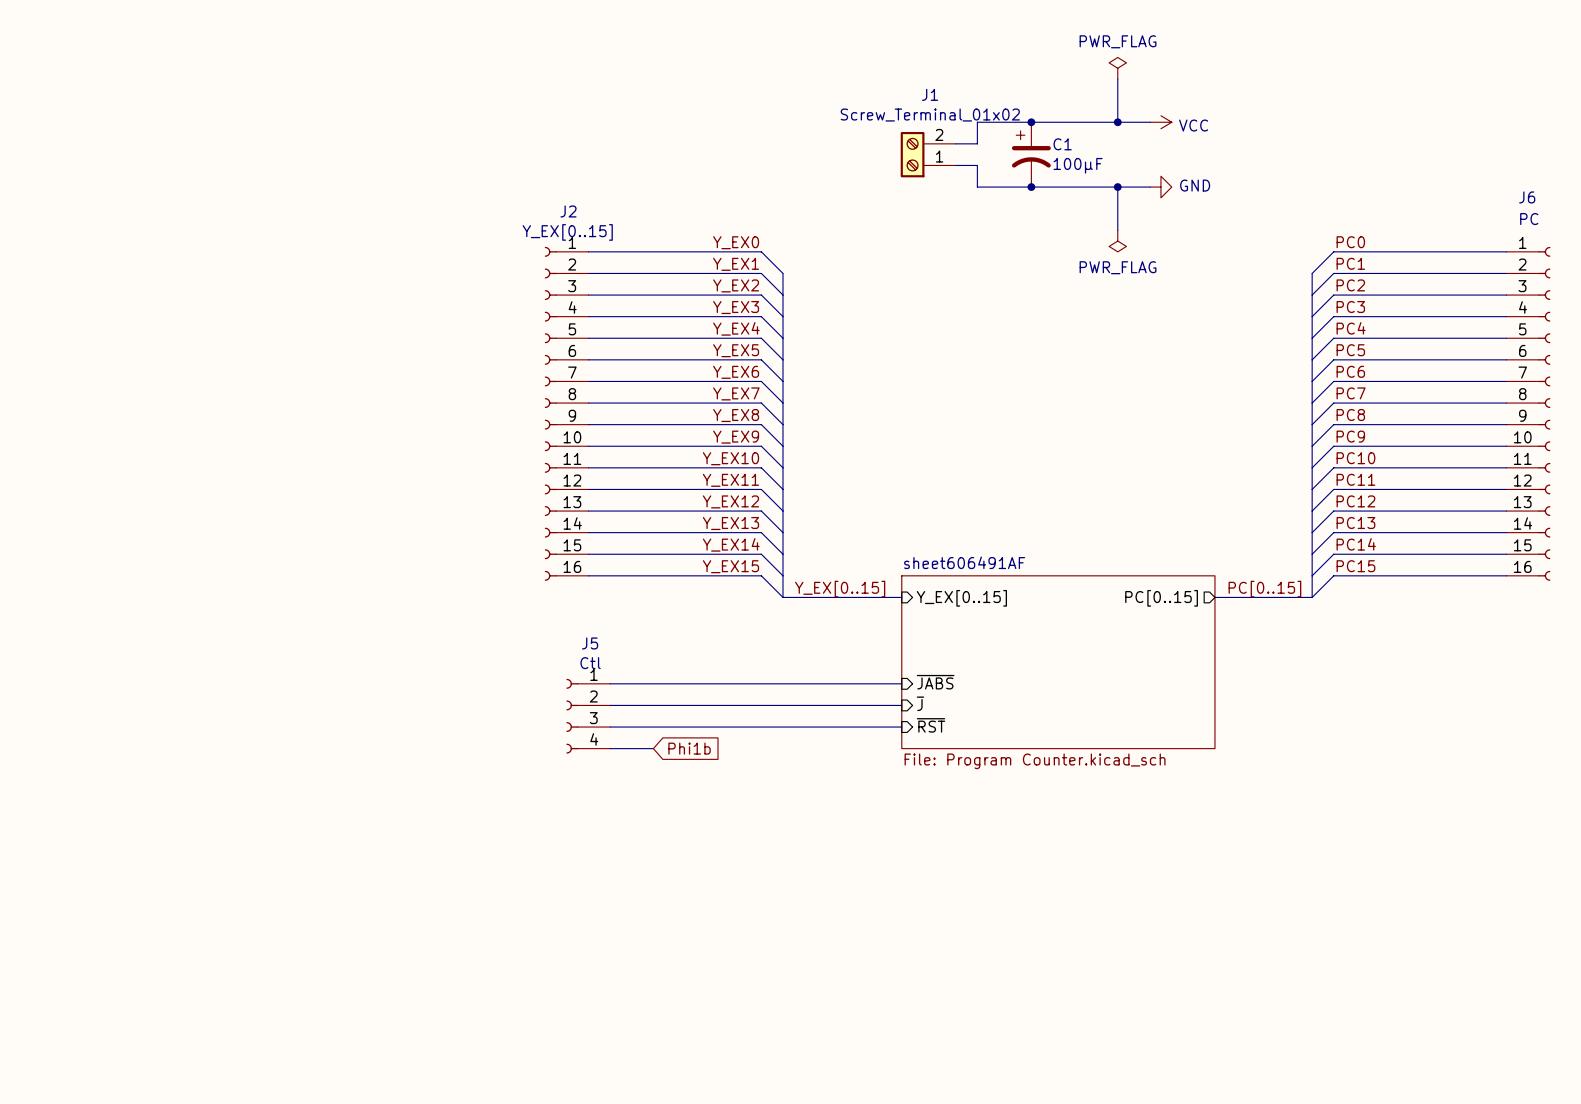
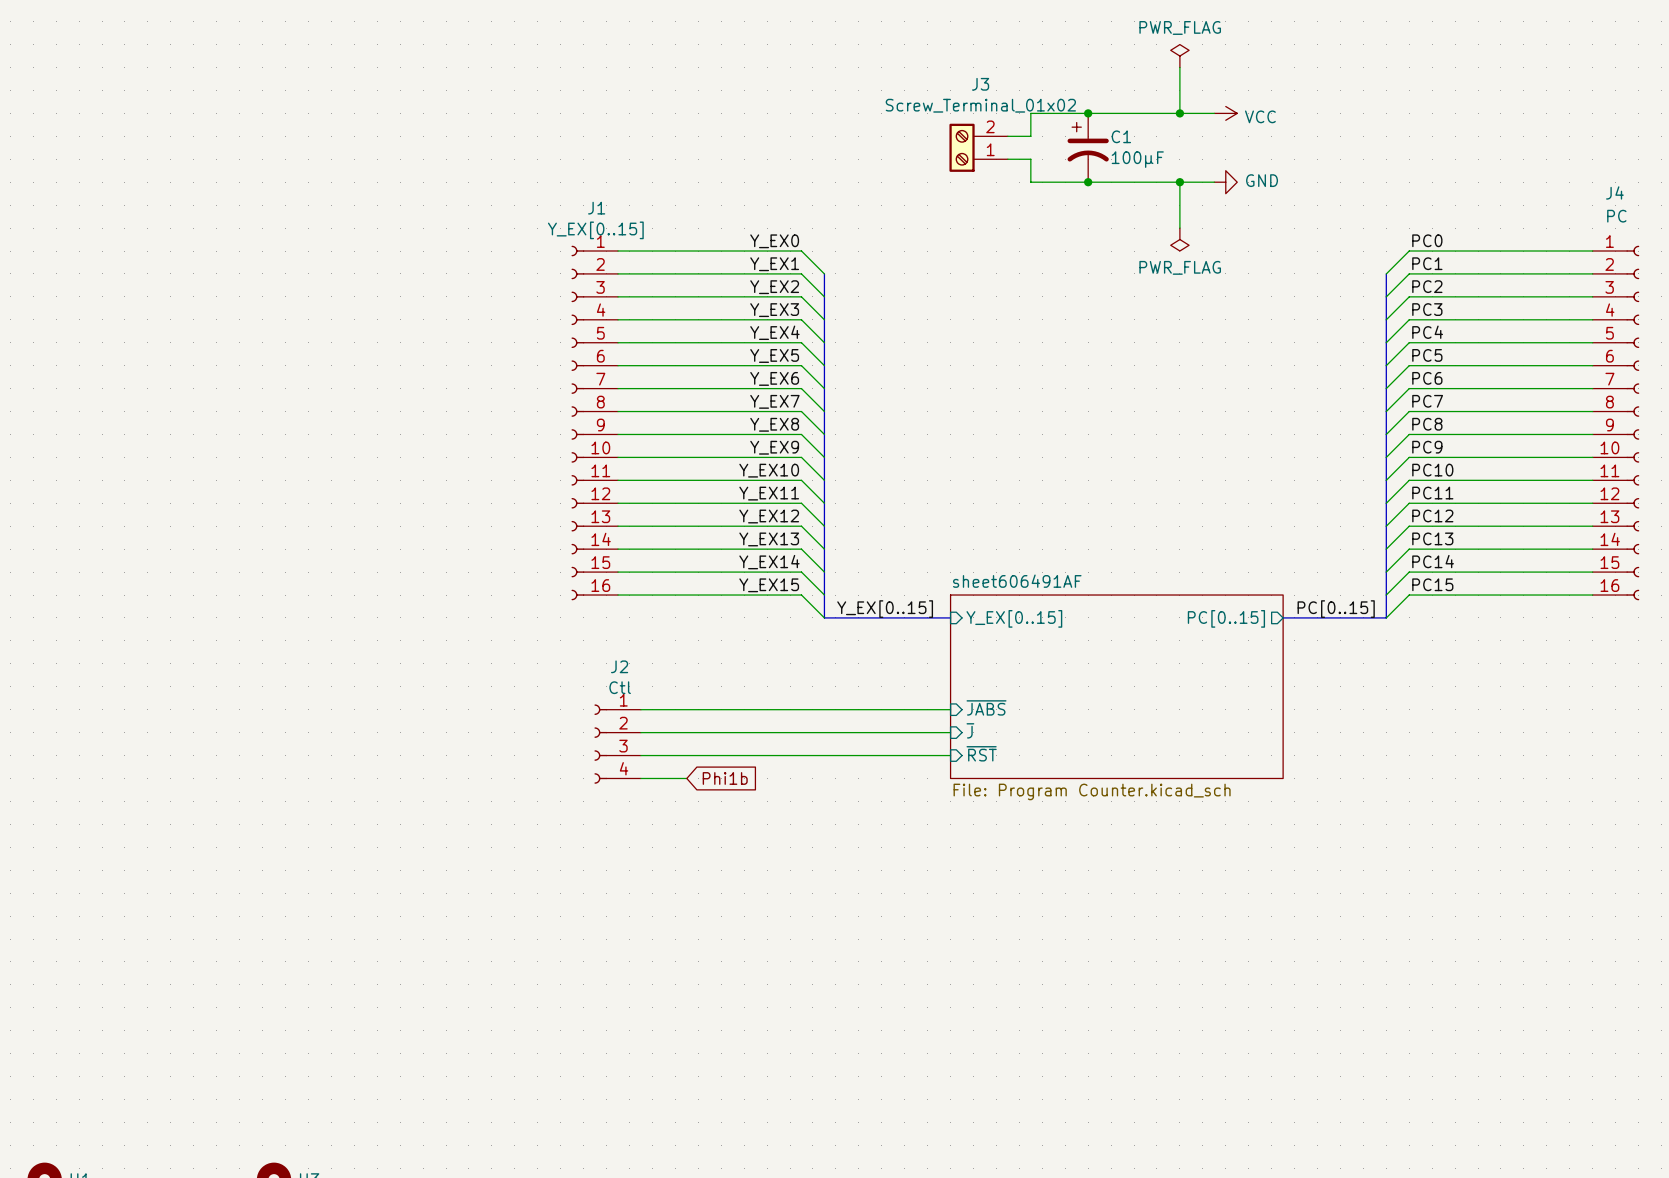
J1 name: J1 (930, 94) -> J3 (980, 84)
J6 name: J6 (1527, 197) -> J4 (1614, 192)
J2 name: J2 (568, 211) -> J1 (596, 208)
J5 name: J5 (590, 643) -> J2 (619, 666)

